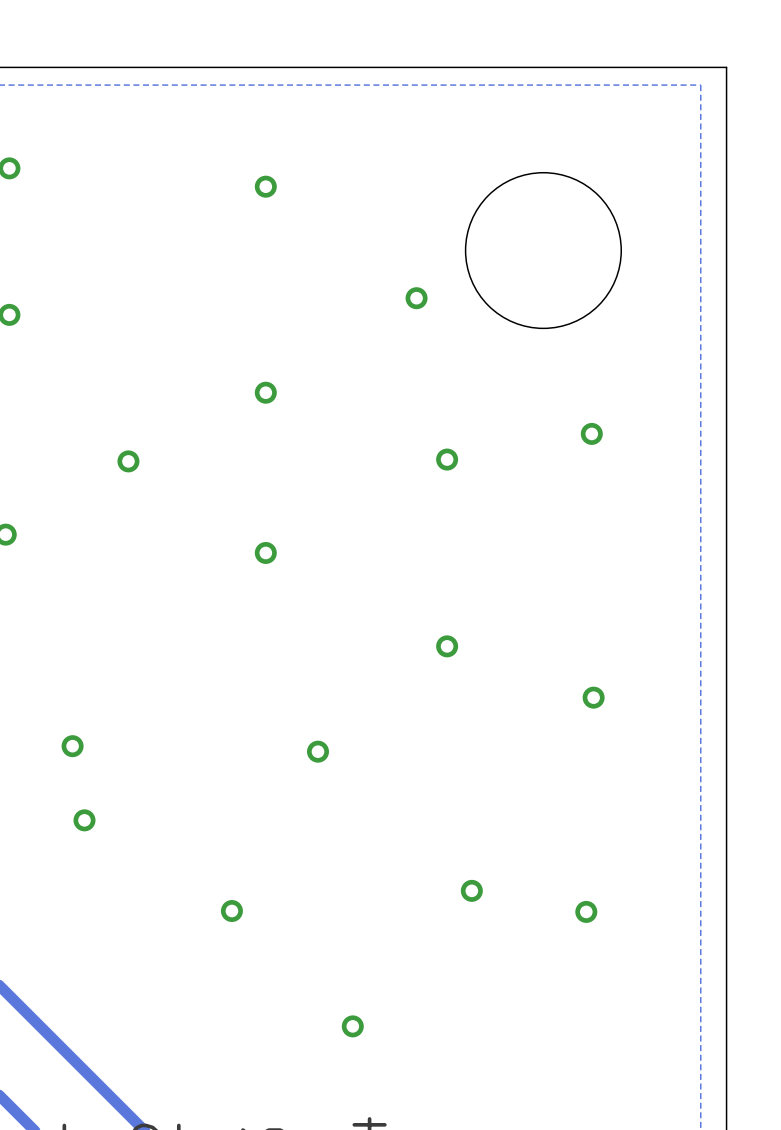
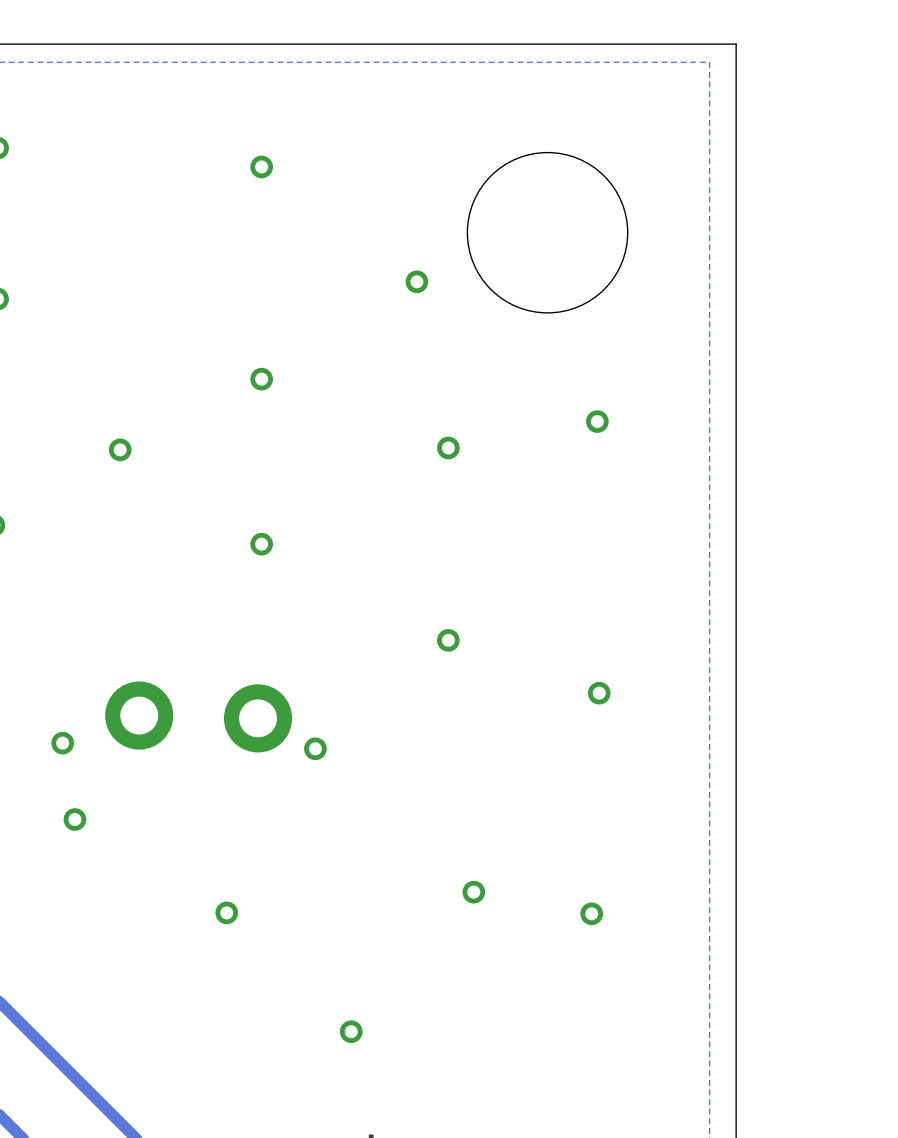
part: none -> (139, 715)
part: none -> (258, 718)

